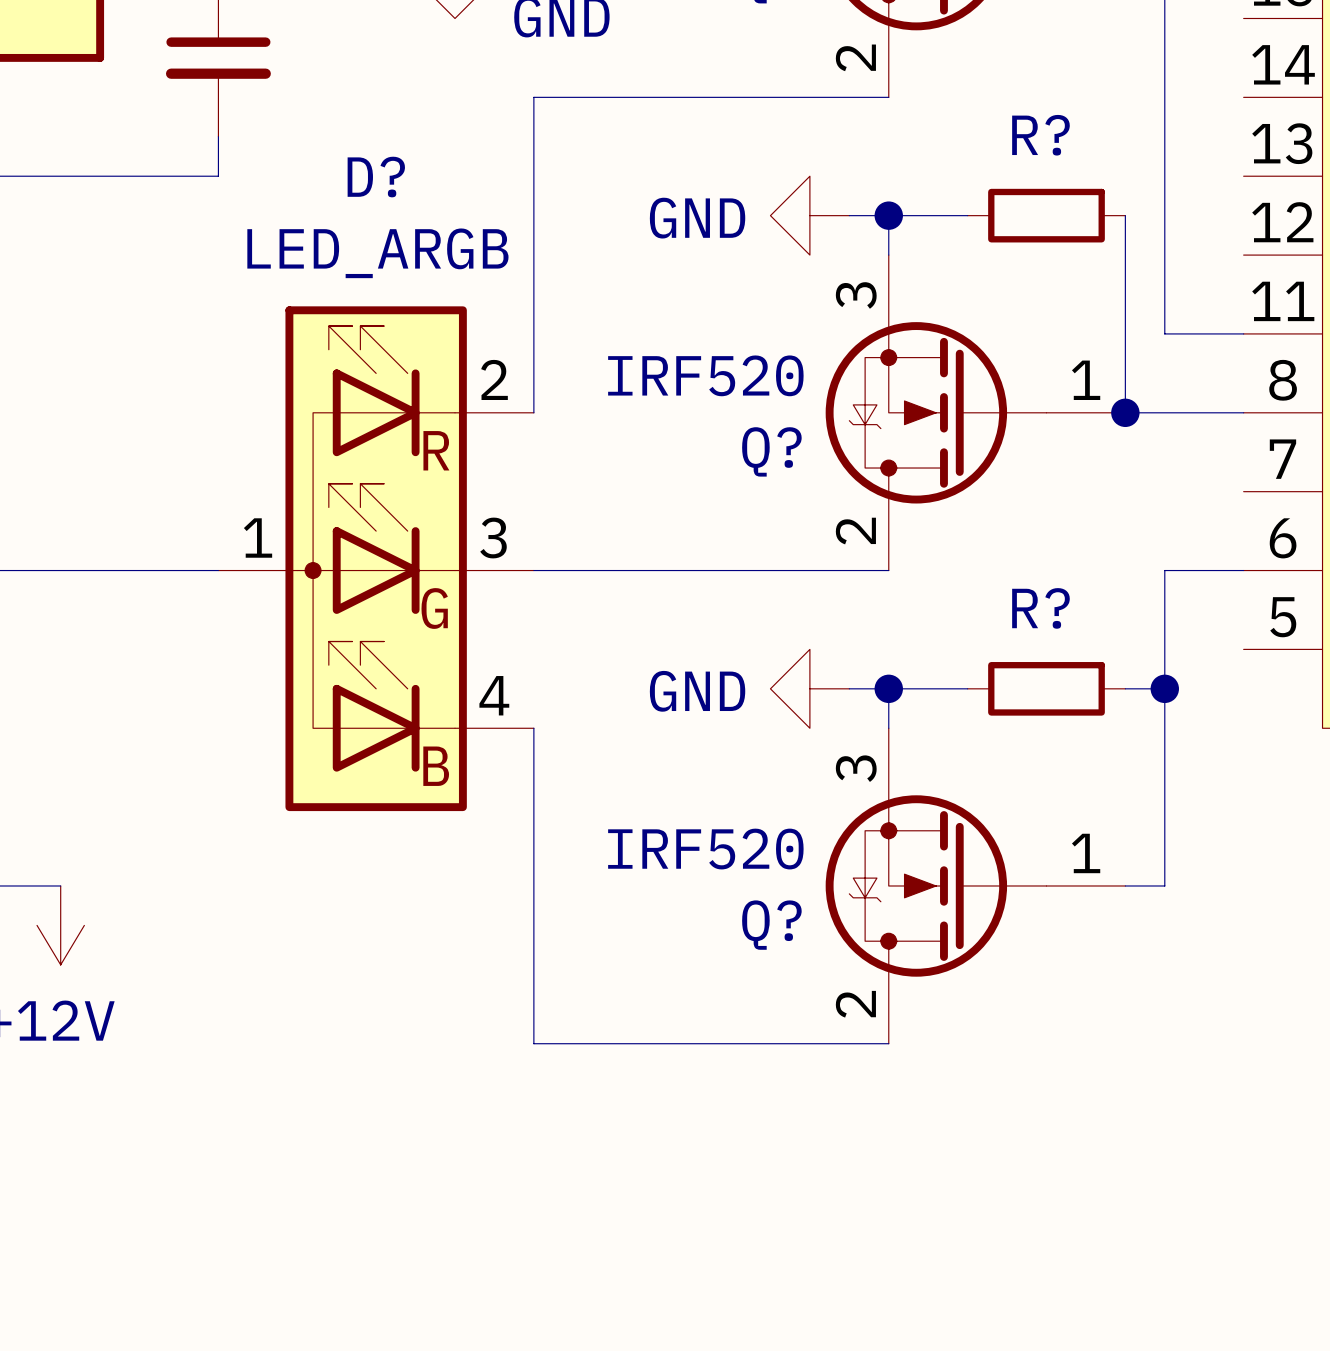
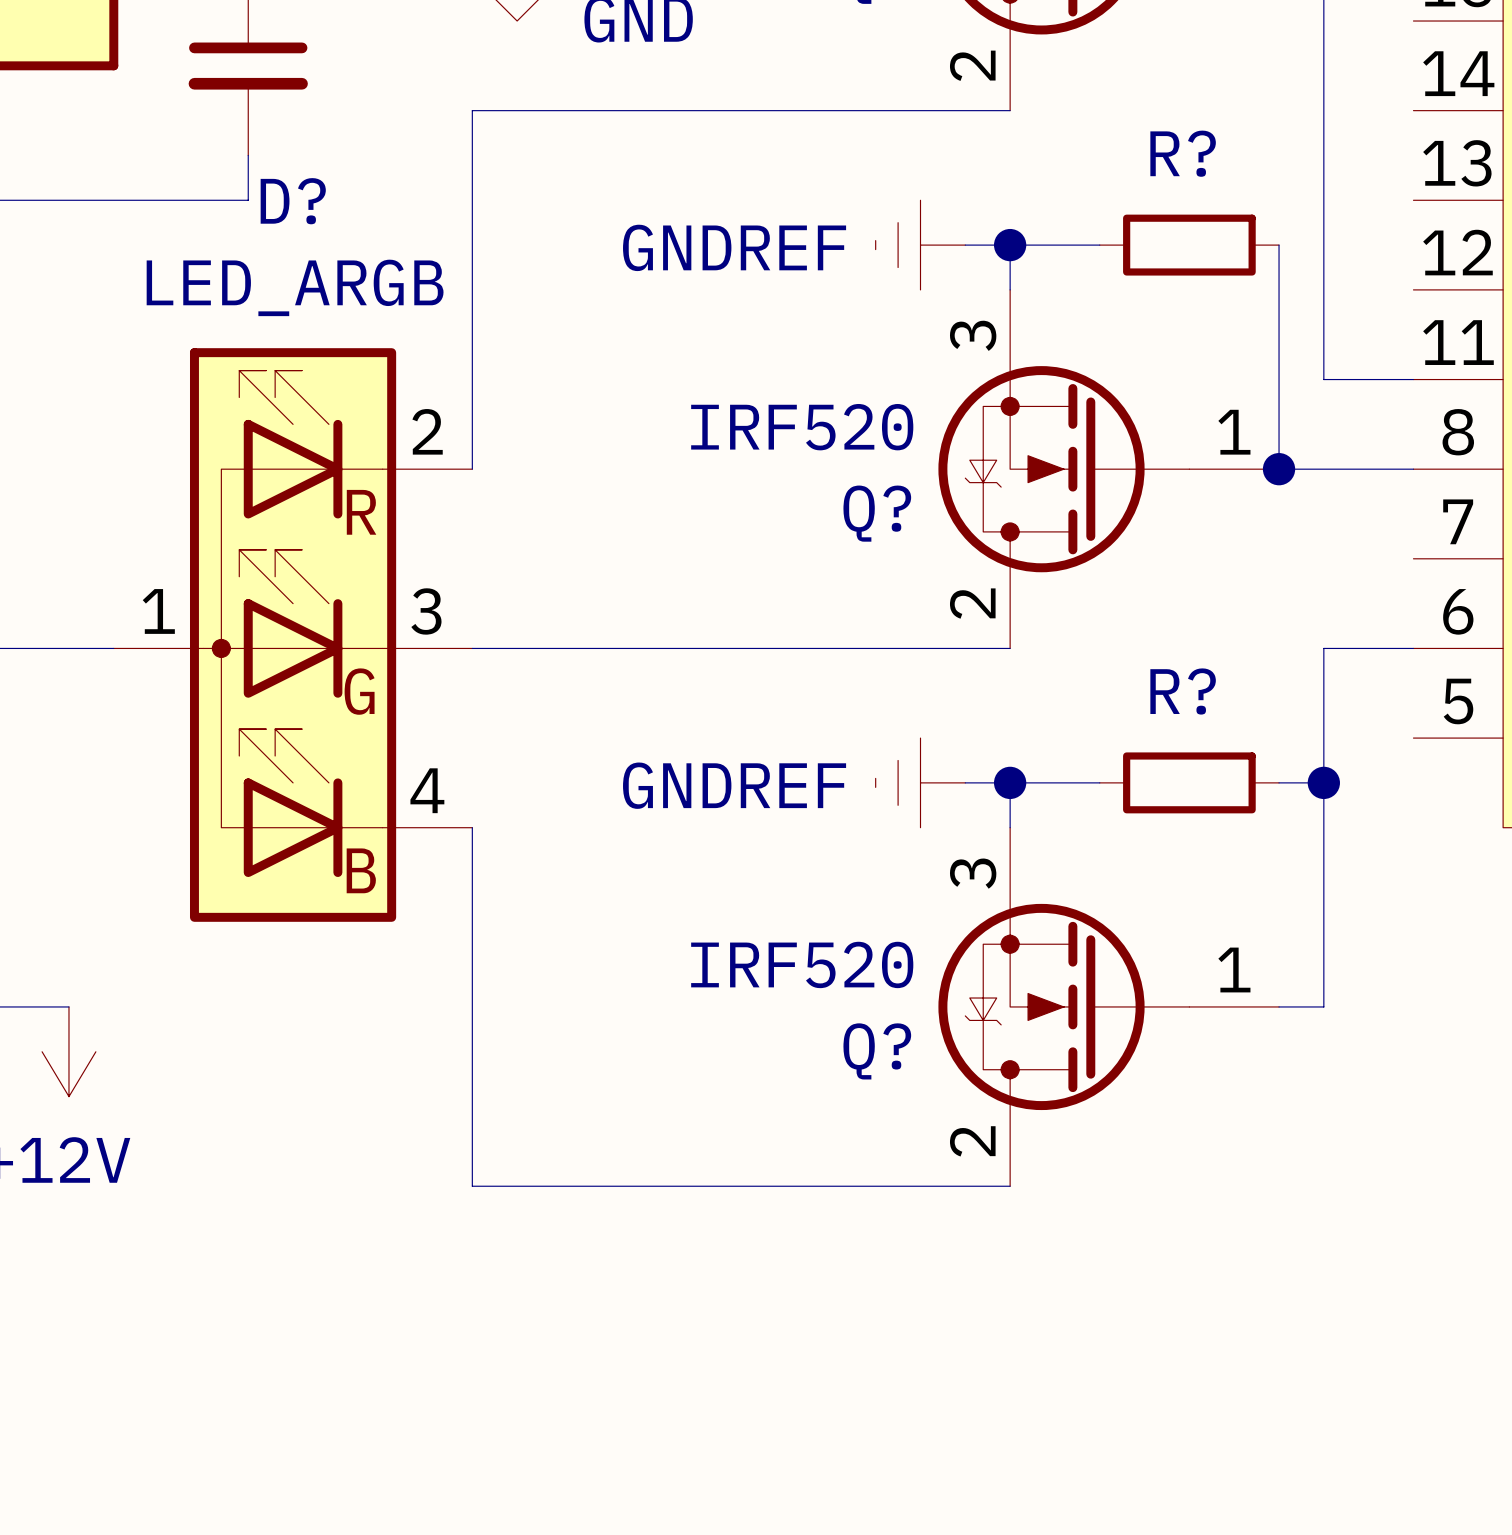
wire: (533, 97) (533, 412) -> (606, 110) (472, 110) (472, 469)
power symbol: GND (809, 215) -> GNDREF (920, 245)
D? position: (376, 558) -> (293, 634)
power symbol: GND (809, 688) -> GNDREF (920, 782)
wire: (533, 728) (533, 1043) -> (472, 827) (472, 1186) (606, 1186)

